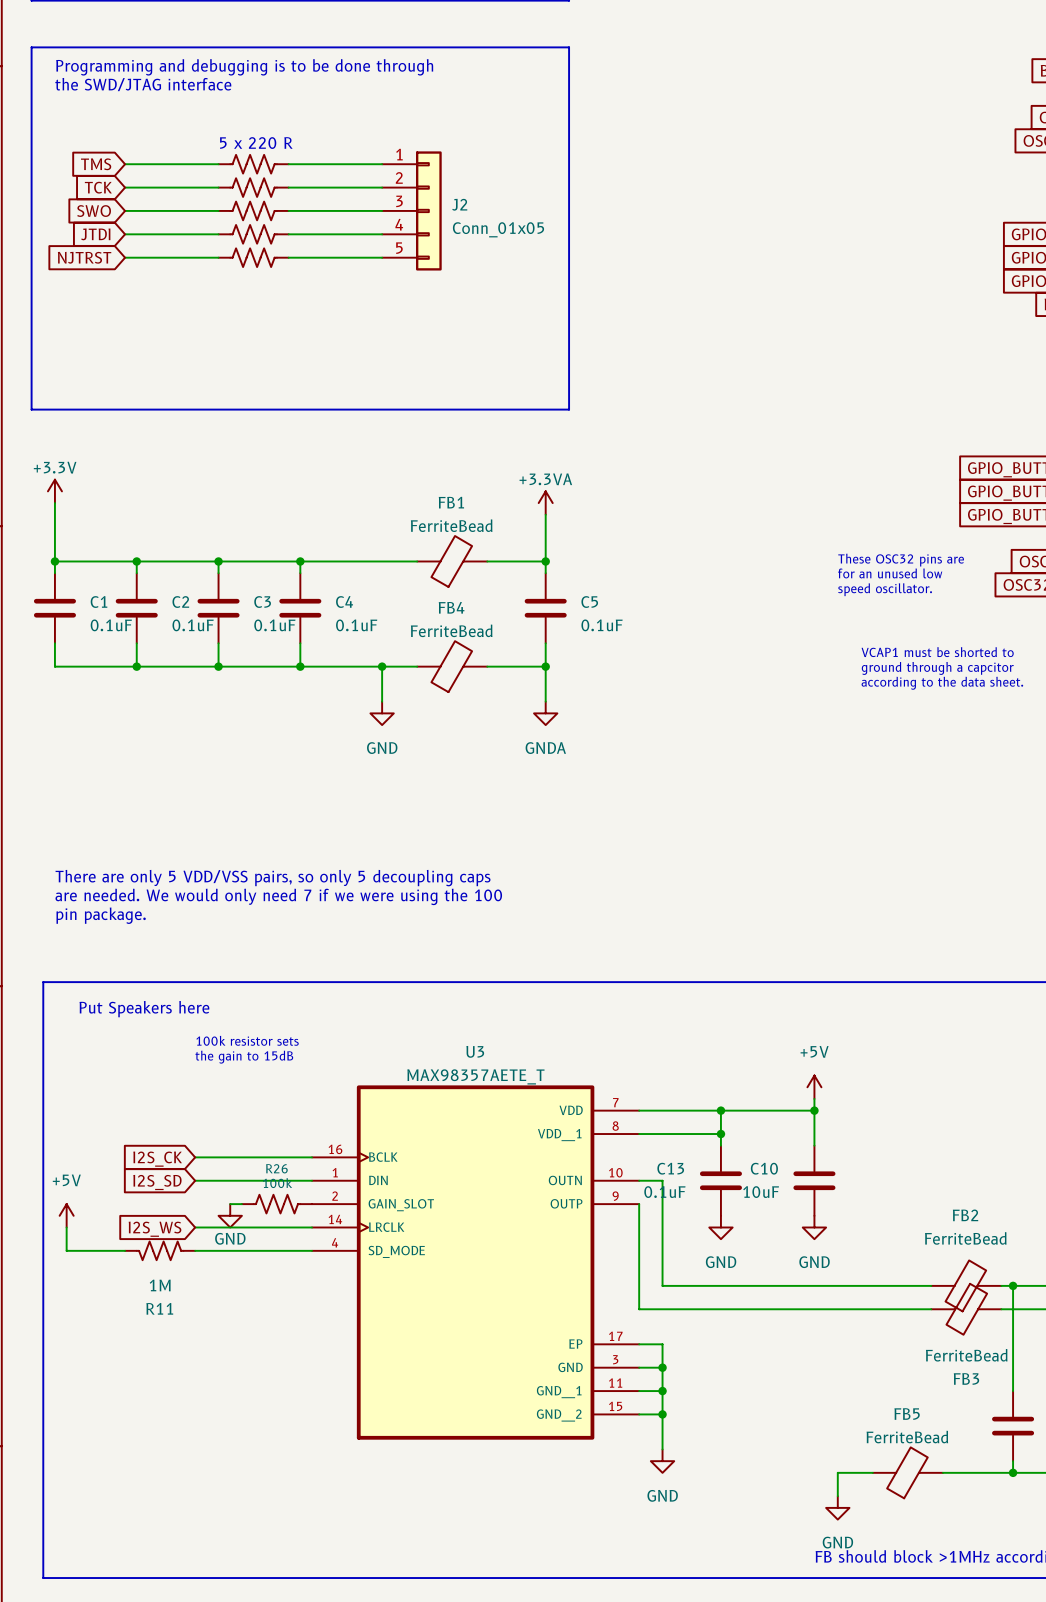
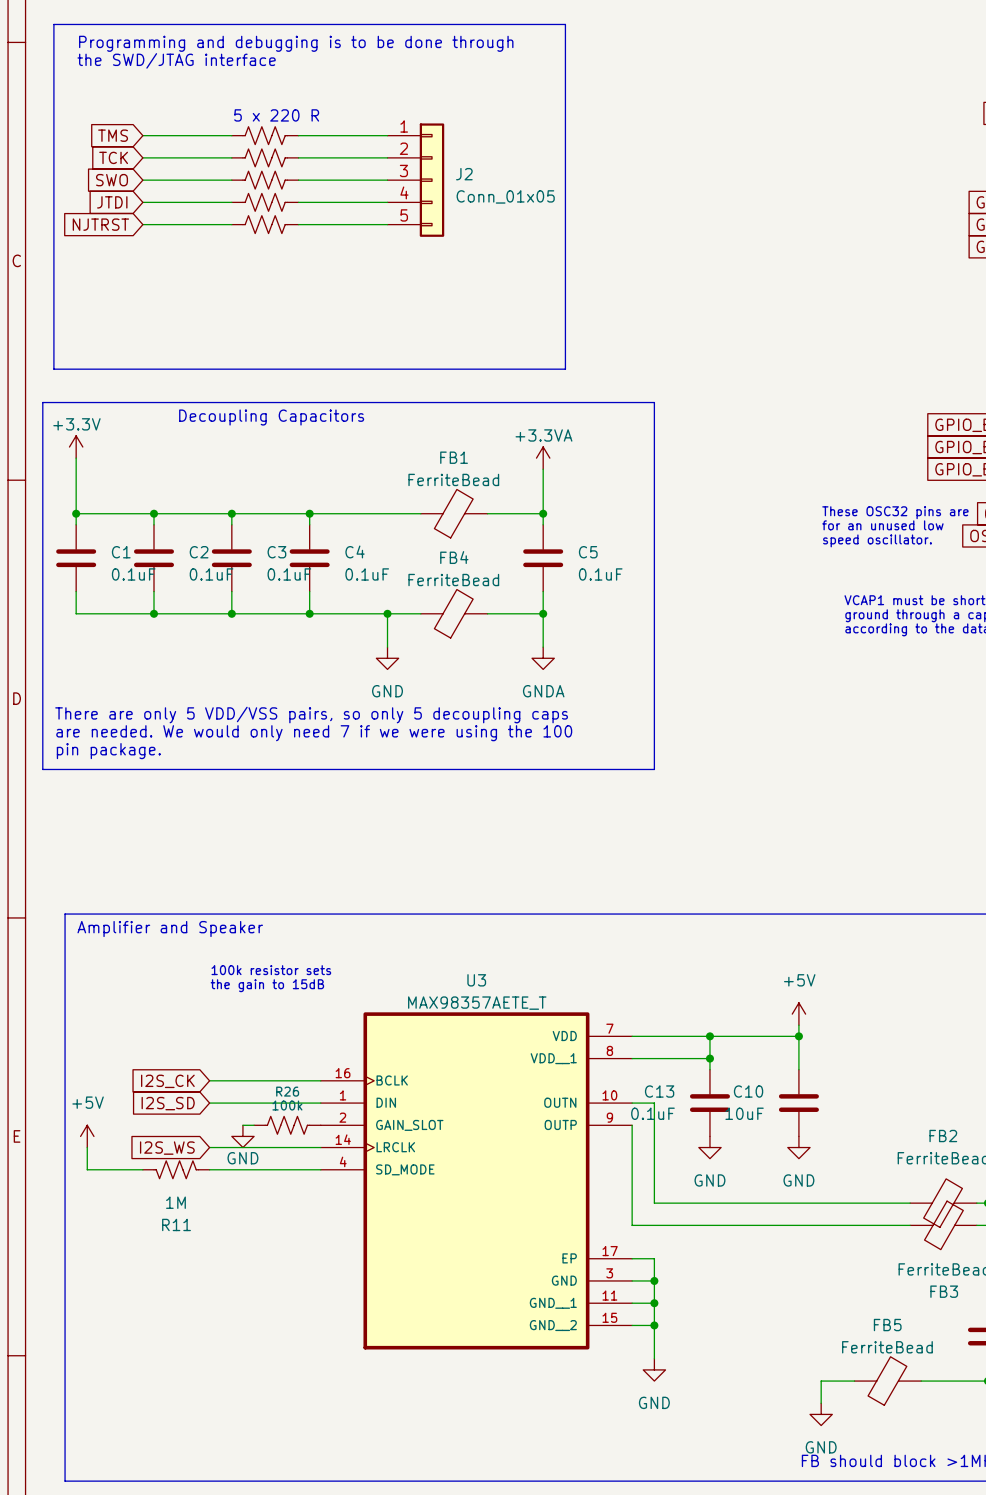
line: none -> (42, 402) (654, 402) (654, 769) (42, 769) (42, 402)
text: none -> Decoupling Capacitors (271, 417)
text position: There are only 5 VDD/VSS pairs, so only 5 decoupling caps (273, 878) -> There are only 5 VDD/VSS pairs, so only 5 decoupling caps (311, 715)
text position: are needed. We would only need 7 if we were using the 100 (278, 896) -> are needed. We would only need 7 if we were using the 100 (314, 733)
text position: pin package. (101, 915) -> pin package. (108, 751)
text: none -> Amplifier and Speaker (170, 929)
text: Put Speakers here (144, 1009) -> none

